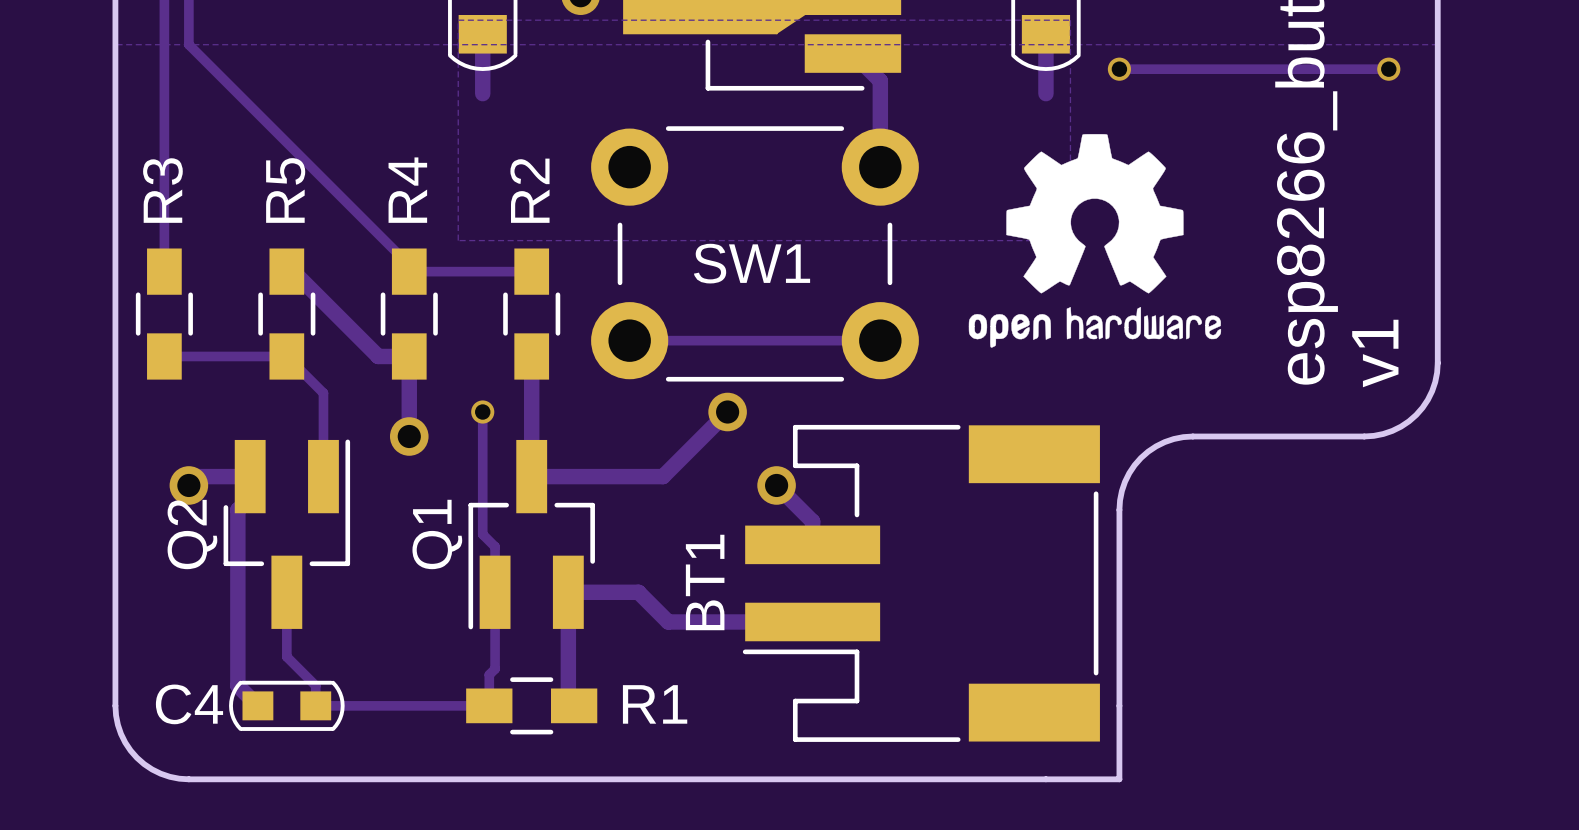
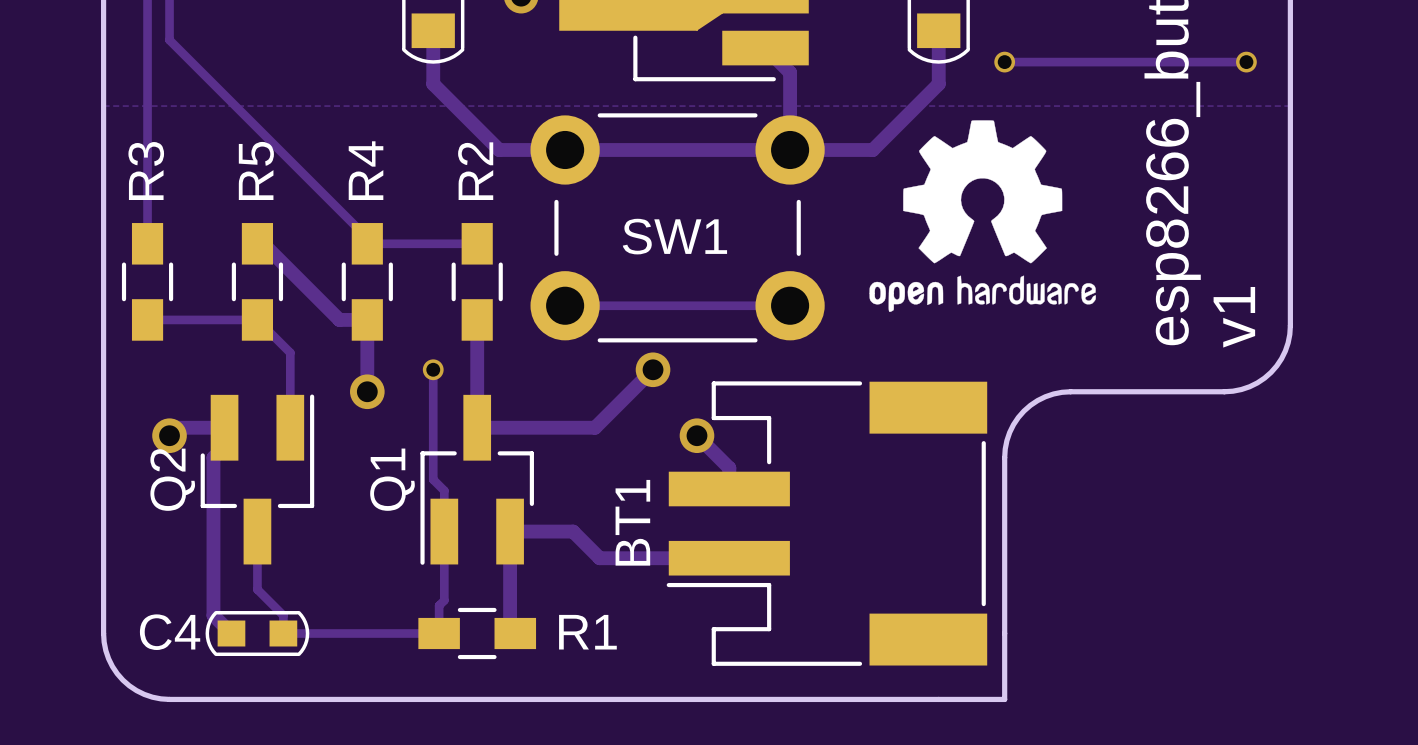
zone outline: (458, 20) (458, 240) (1070, 240) (1070, 20) (458, 20) -> none
zone outline: (115, 44) (1437, 44) -> (103, 40) (103, 106) (1290, 106) (1290, 40)
track: none -> (433, 84) (499, 149) (872, 149) (938, 84)

